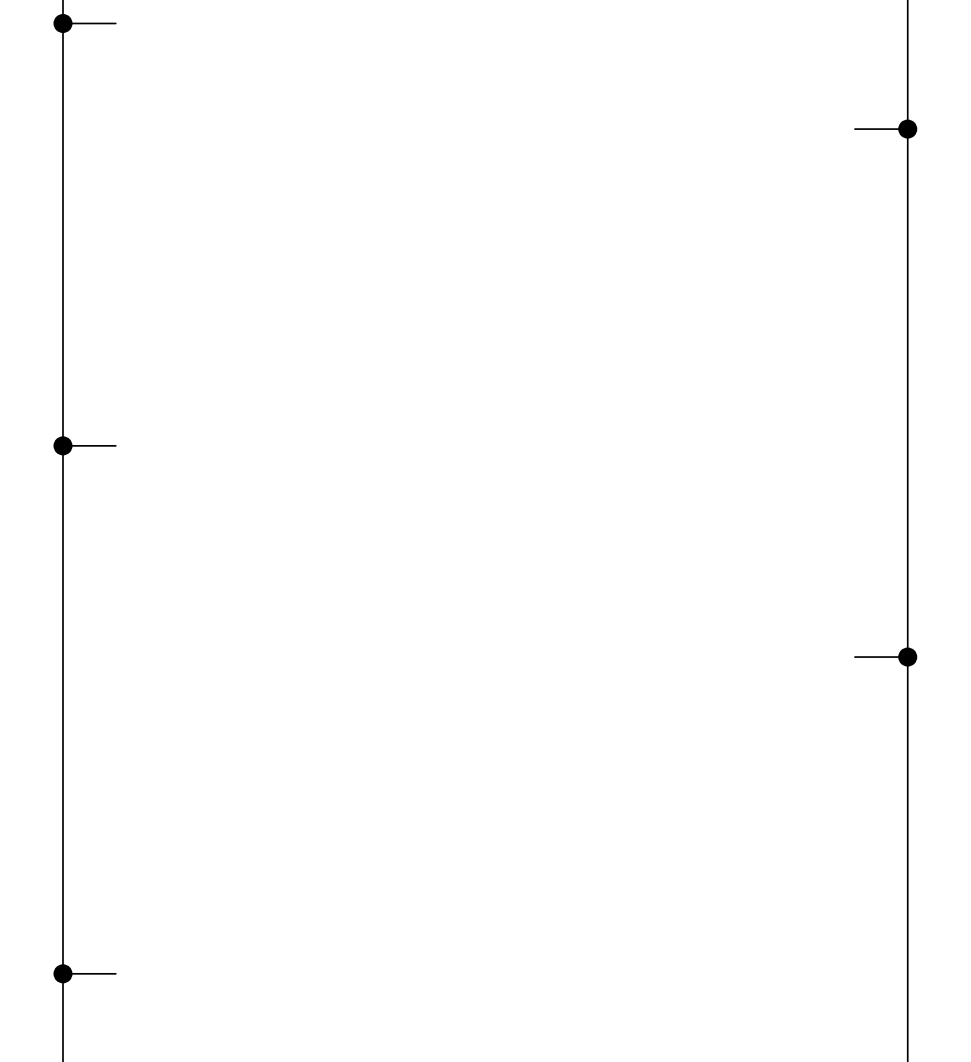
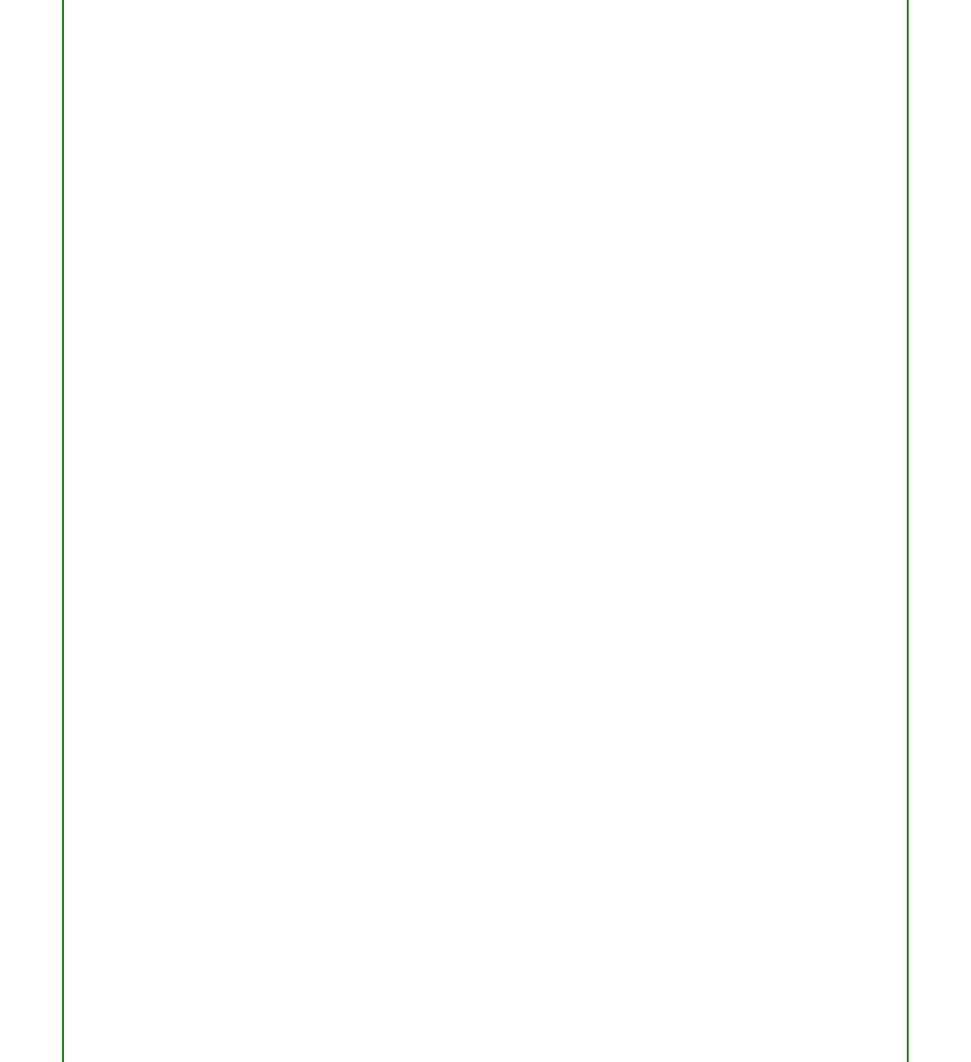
wire: (62, 23) (115, 23) -> none
junction: (62, 23) -> none
wire: (854, 129) (907, 129) -> none
junction: (907, 129) -> none
wire: (62, 445) (115, 445) -> none
junction: (62, 445) -> none
wire: (854, 657) (907, 657) -> none
junction: (907, 657) -> none
wire: (62, 973) (115, 973) -> none
junction: (62, 973) -> none

